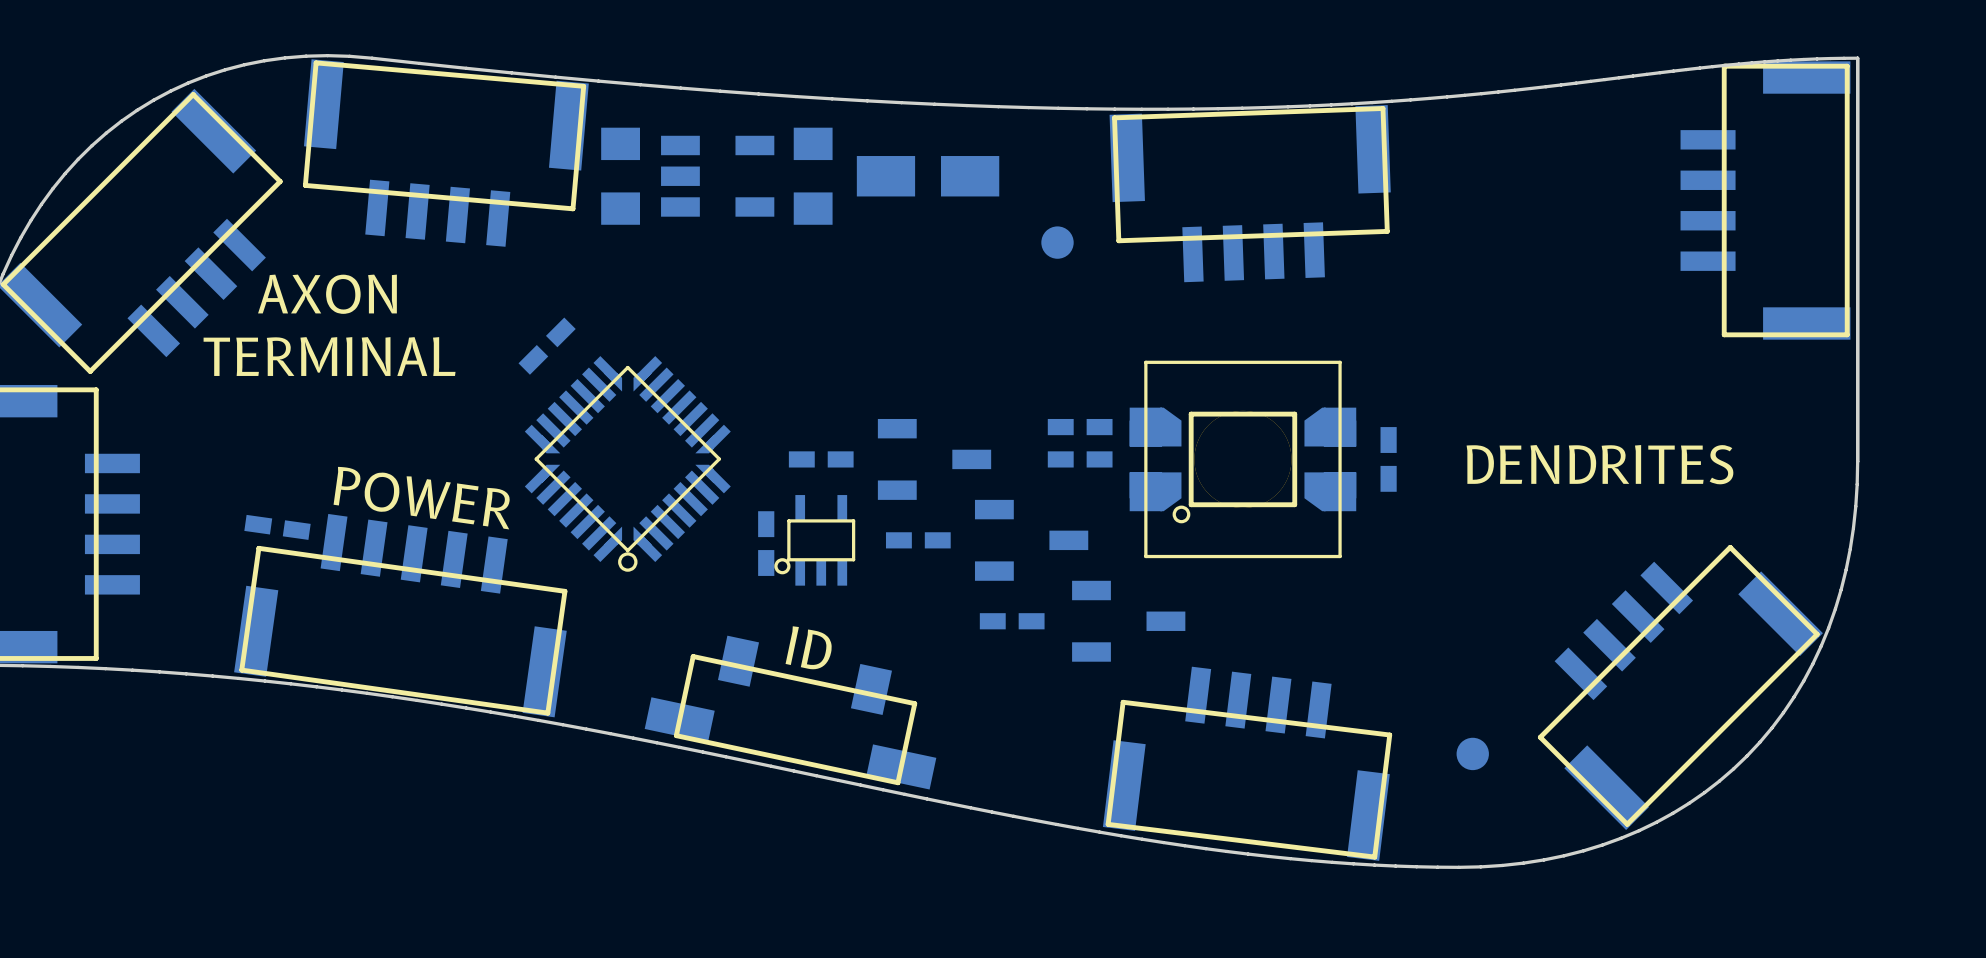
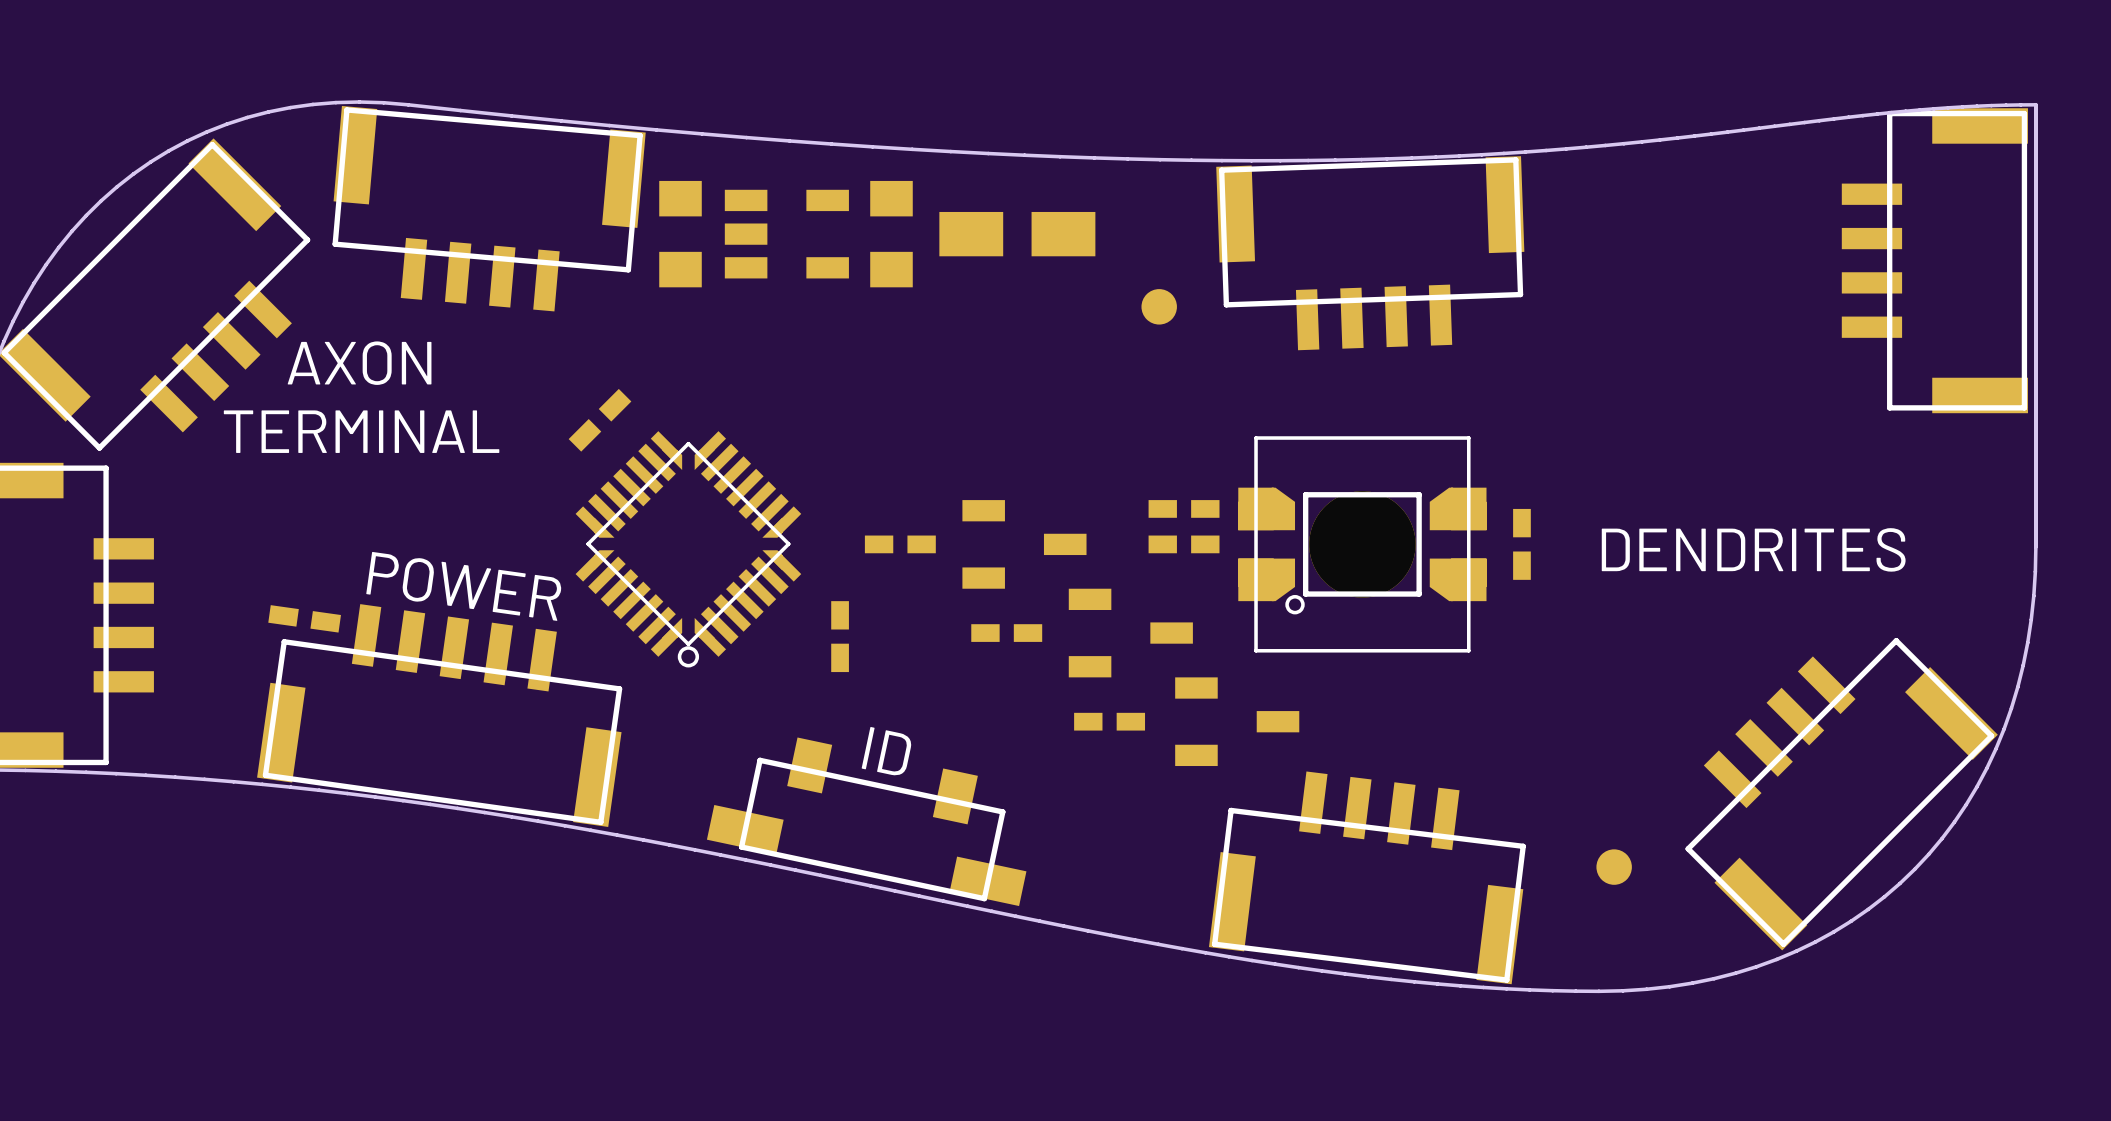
part: (814, 540) -> none

